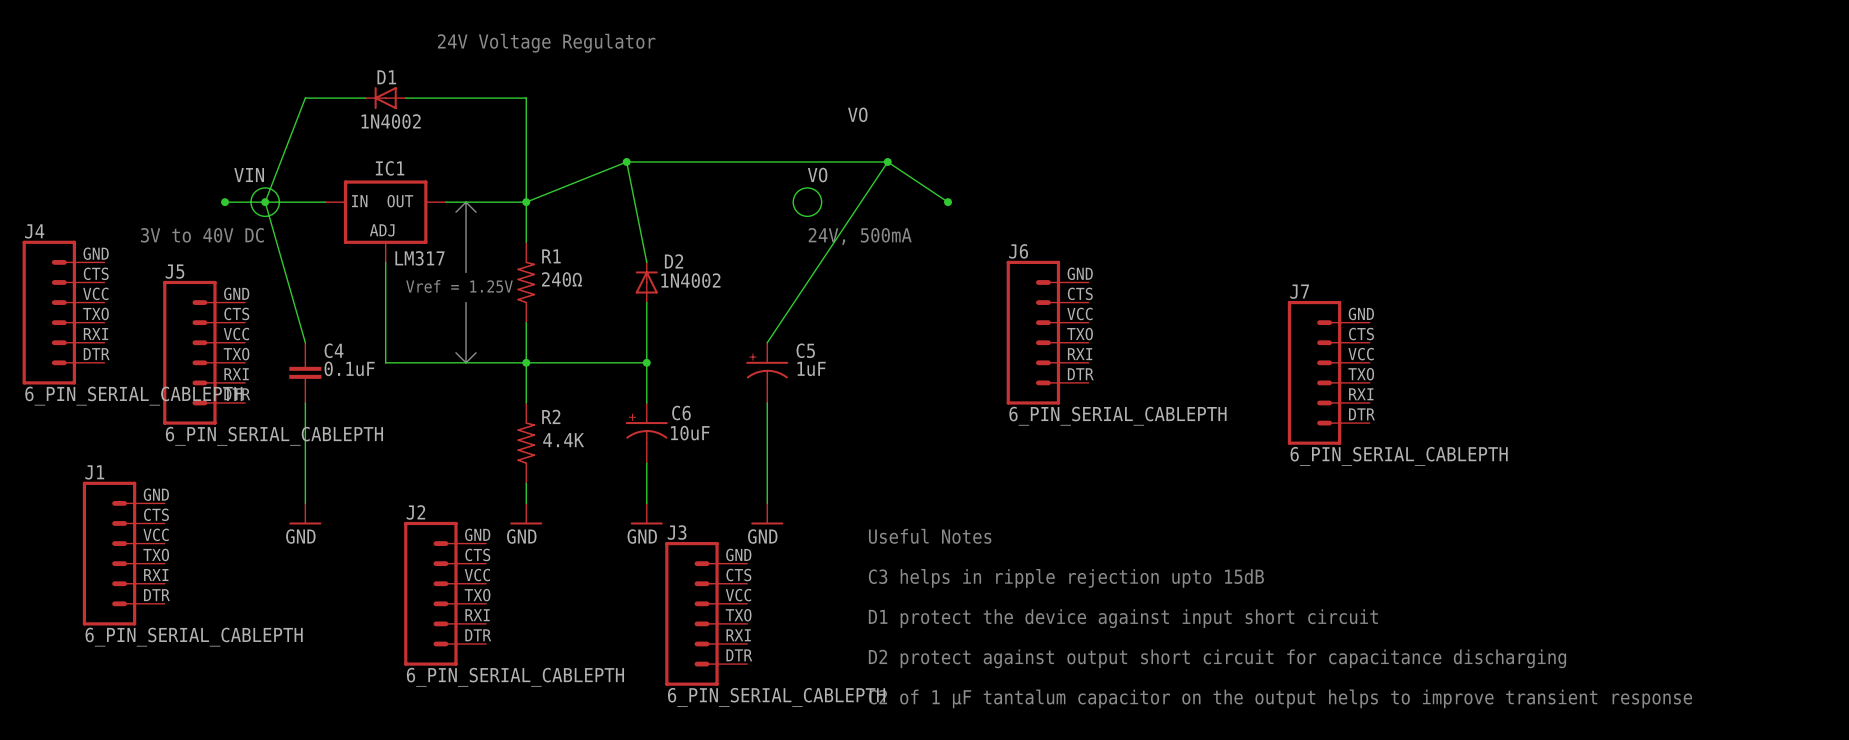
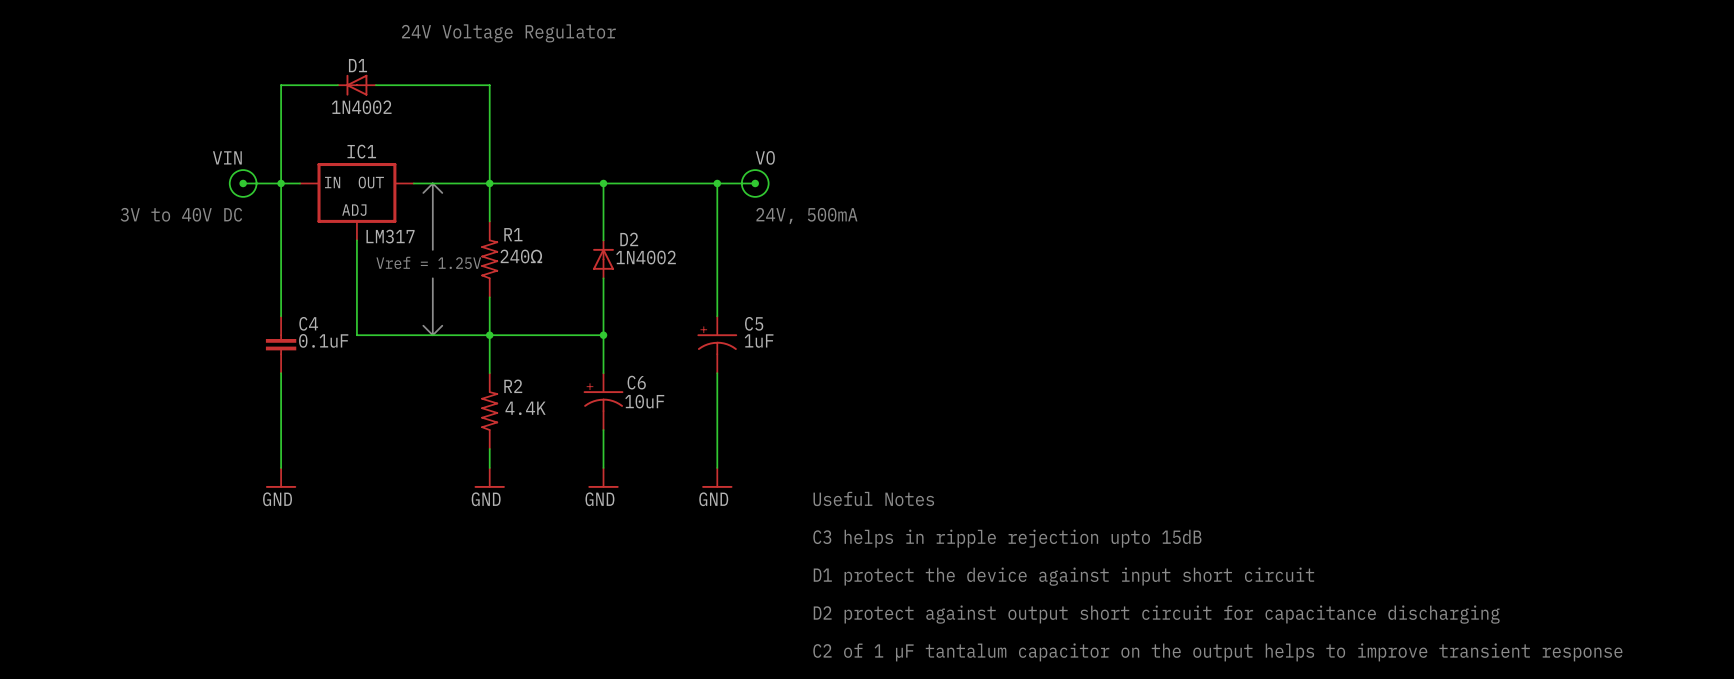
wire: (305, 98) (265, 202) -> none
label: VO (857, 114) -> none
wire: (626, 161) (646, 262) -> (603, 183) (603, 240)
wire: (626, 161) (526, 202) -> (755, 183) (489, 183)
wire: (626, 161) (887, 161) -> none
junction position: (626, 161) -> (603, 183)
wire: (887, 161) (767, 342) -> (717, 183) (717, 316)
wire: (887, 161) (948, 202) -> none
junction: (887, 161) -> none
wire: (225, 202) (265, 202) -> none
junction: (225, 202) -> none
wire: (265, 202) (305, 342) -> (281, 85) (281, 316)
junction: none -> (281, 183)
junction: none -> (717, 183)
junction: none -> (755, 183)
junction: (948, 202) -> none
J4: 6_PIN_SERIAL_CABLEPTH (63, 312) -> none
J6: 6_PIN_SERIAL_CABLEPTH (1047, 332) -> none
J5: 6_PIN_SERIAL_CABLEPTH (204, 352) -> none
J7: 6_PIN_SERIAL_CABLEPTH (1328, 372) -> none
J1: 6_PIN_SERIAL_CABLEPTH (123, 553) -> none
J2: 6_PIN_SERIAL_CABLEPTH (445, 593) -> none
J3: 6_PIN_SERIAL_CABLEPTH (706, 613) -> none

